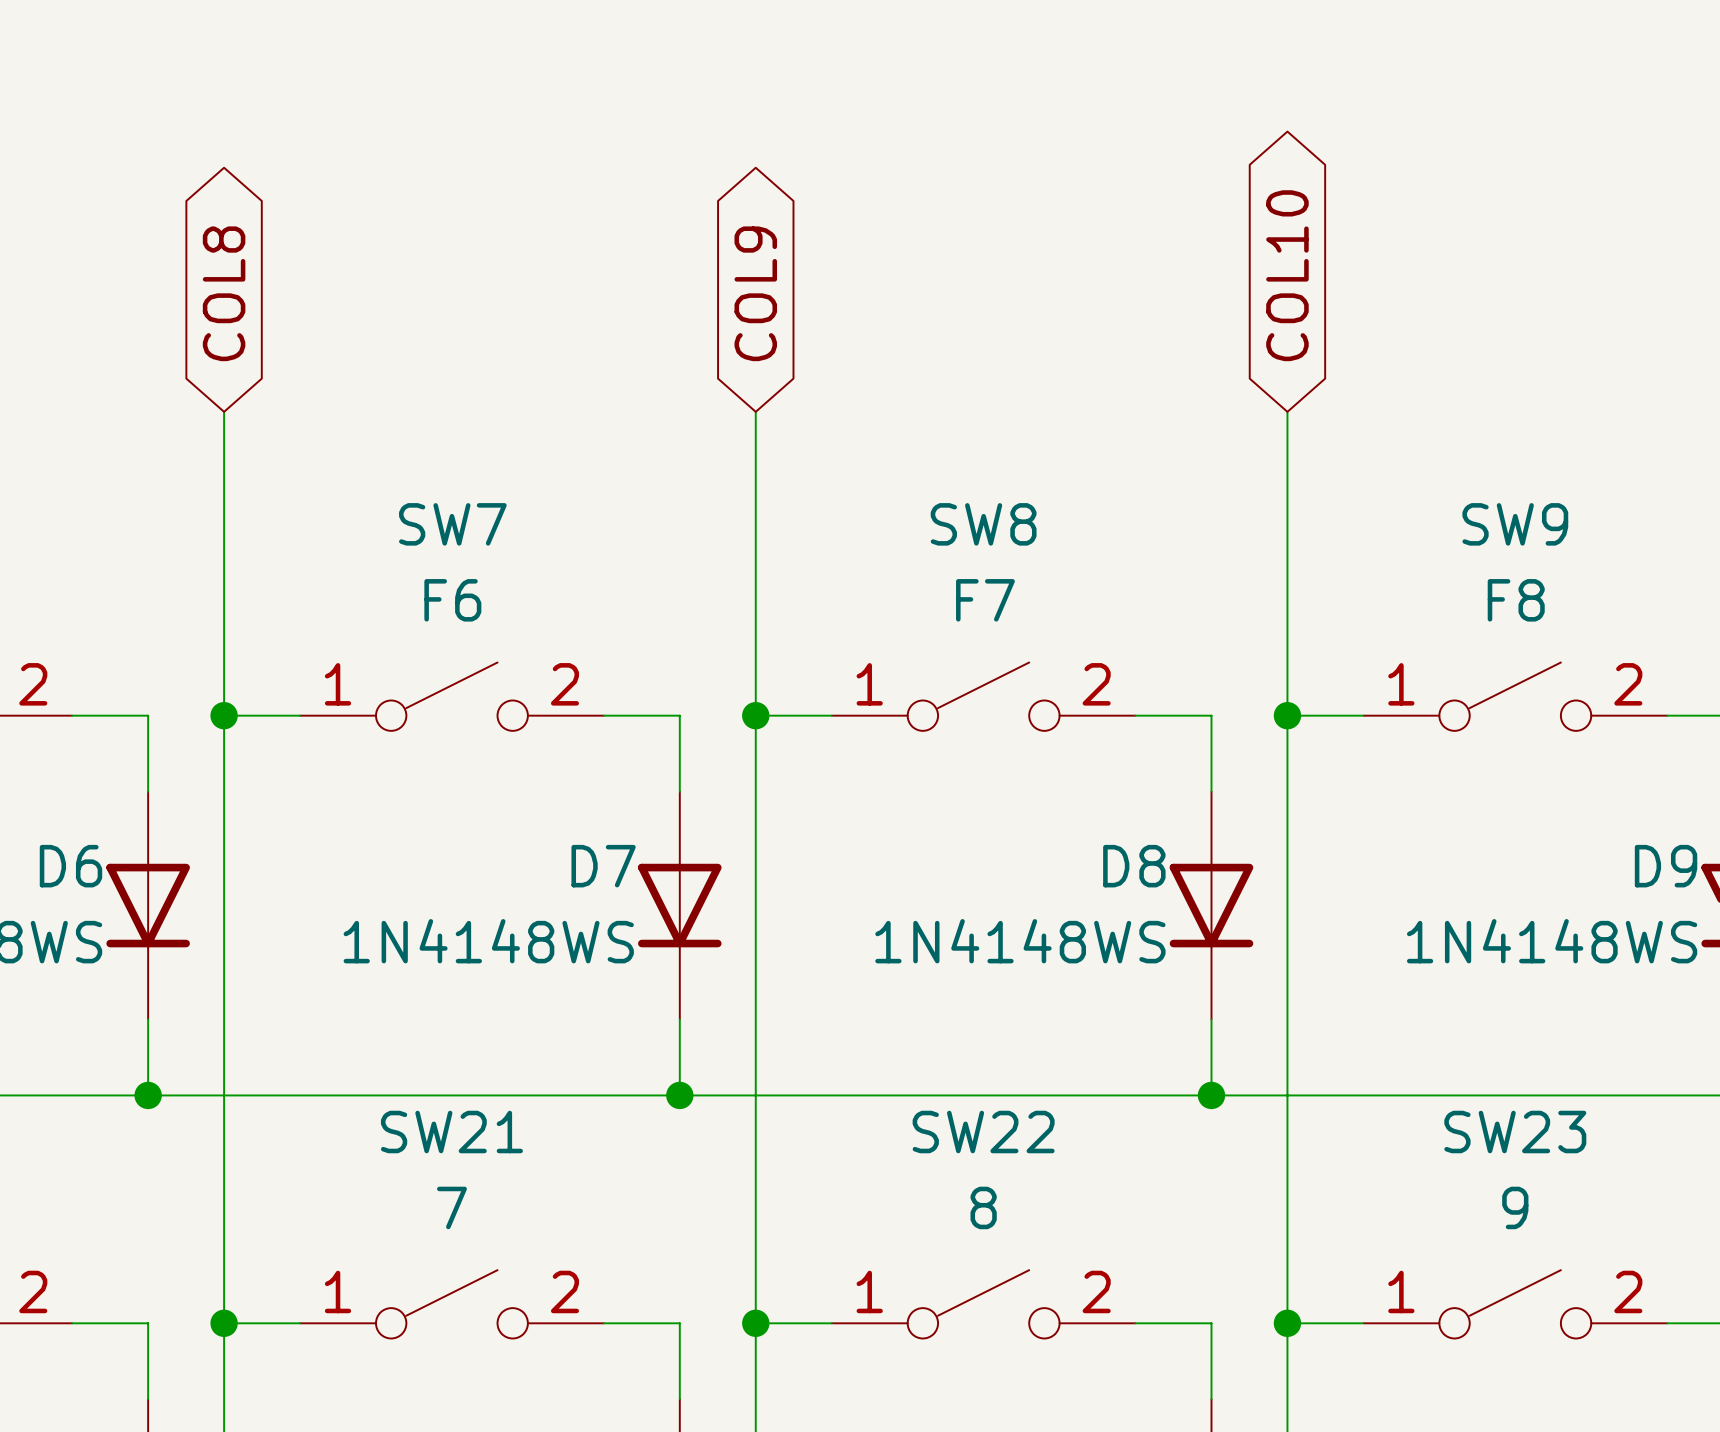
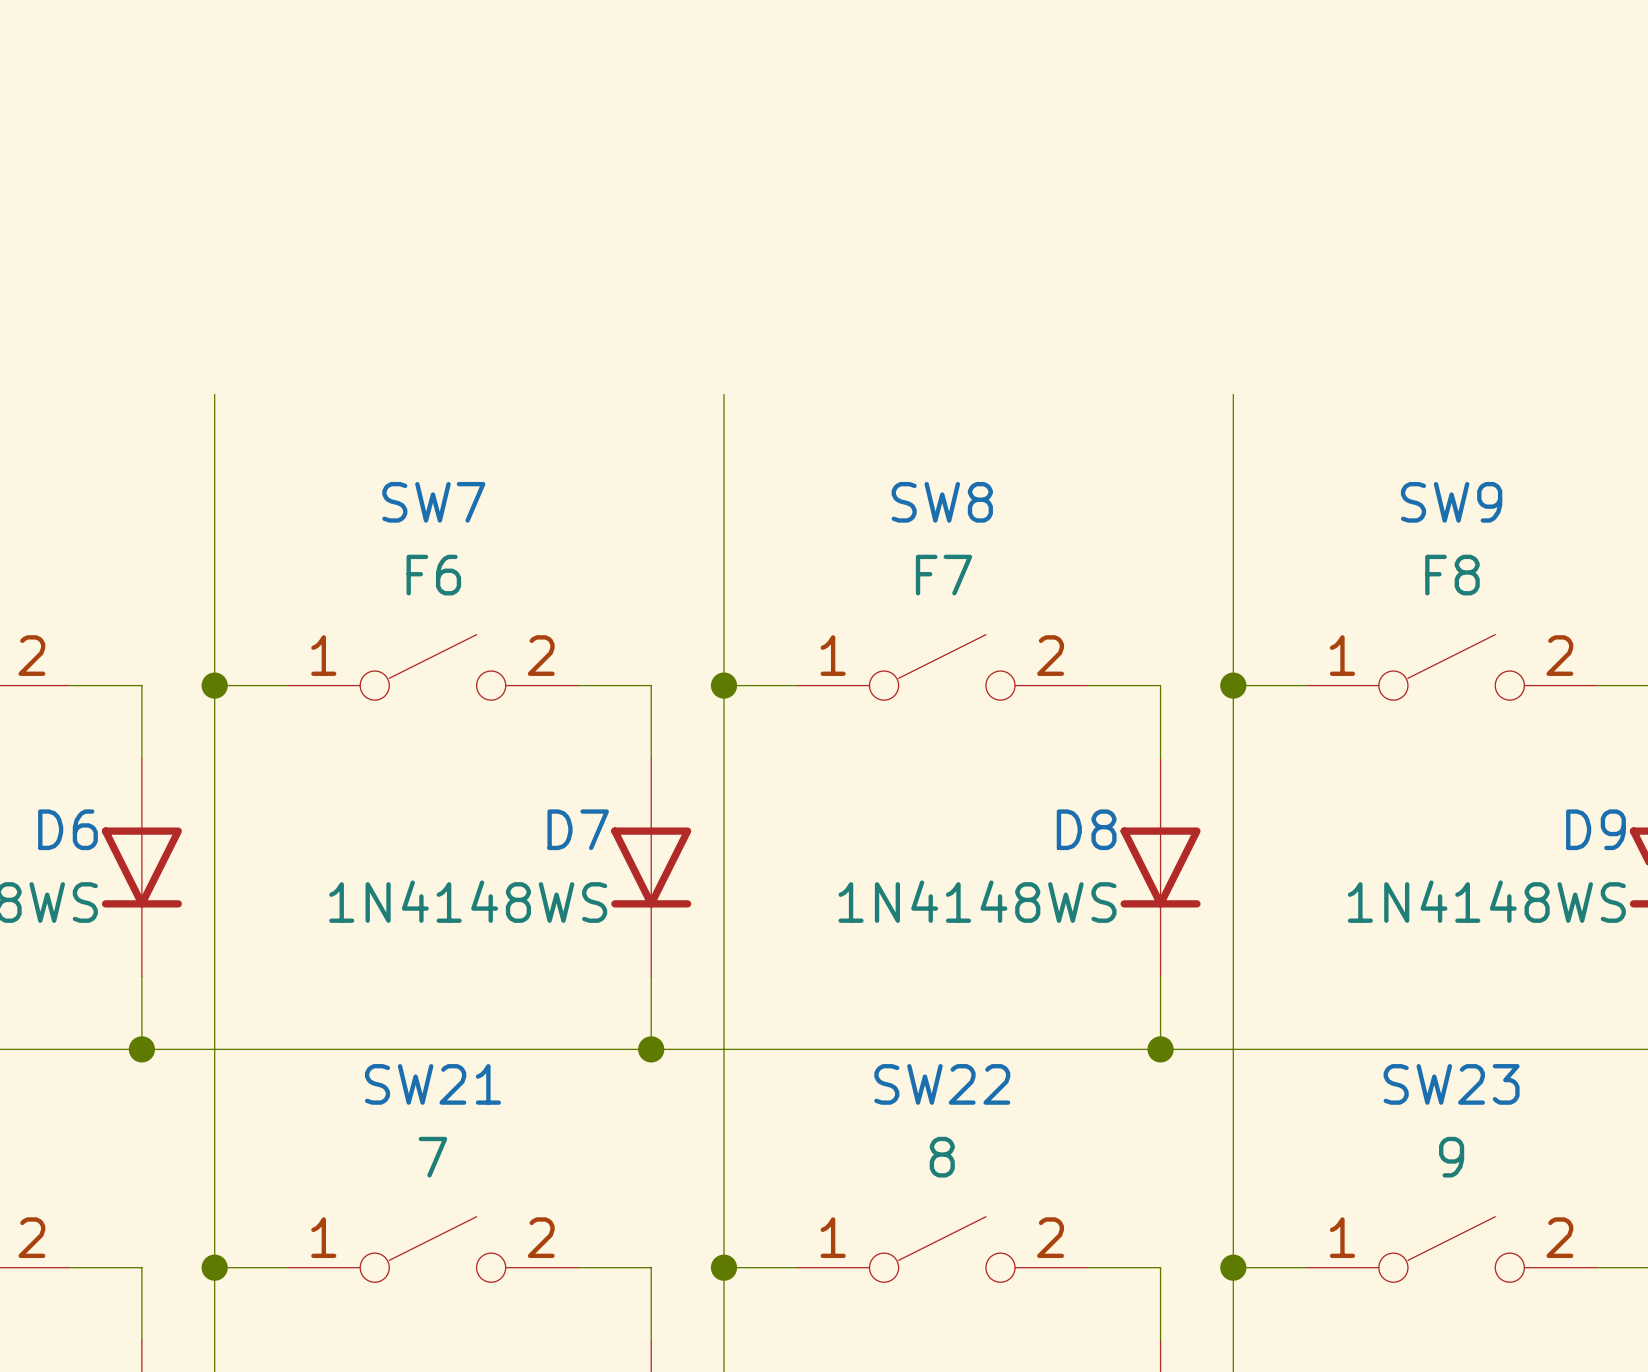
global label: COL10 (1287, 275) -> none
global label: COL8 (224, 293) -> none
global label: COL9 (755, 293) -> none

